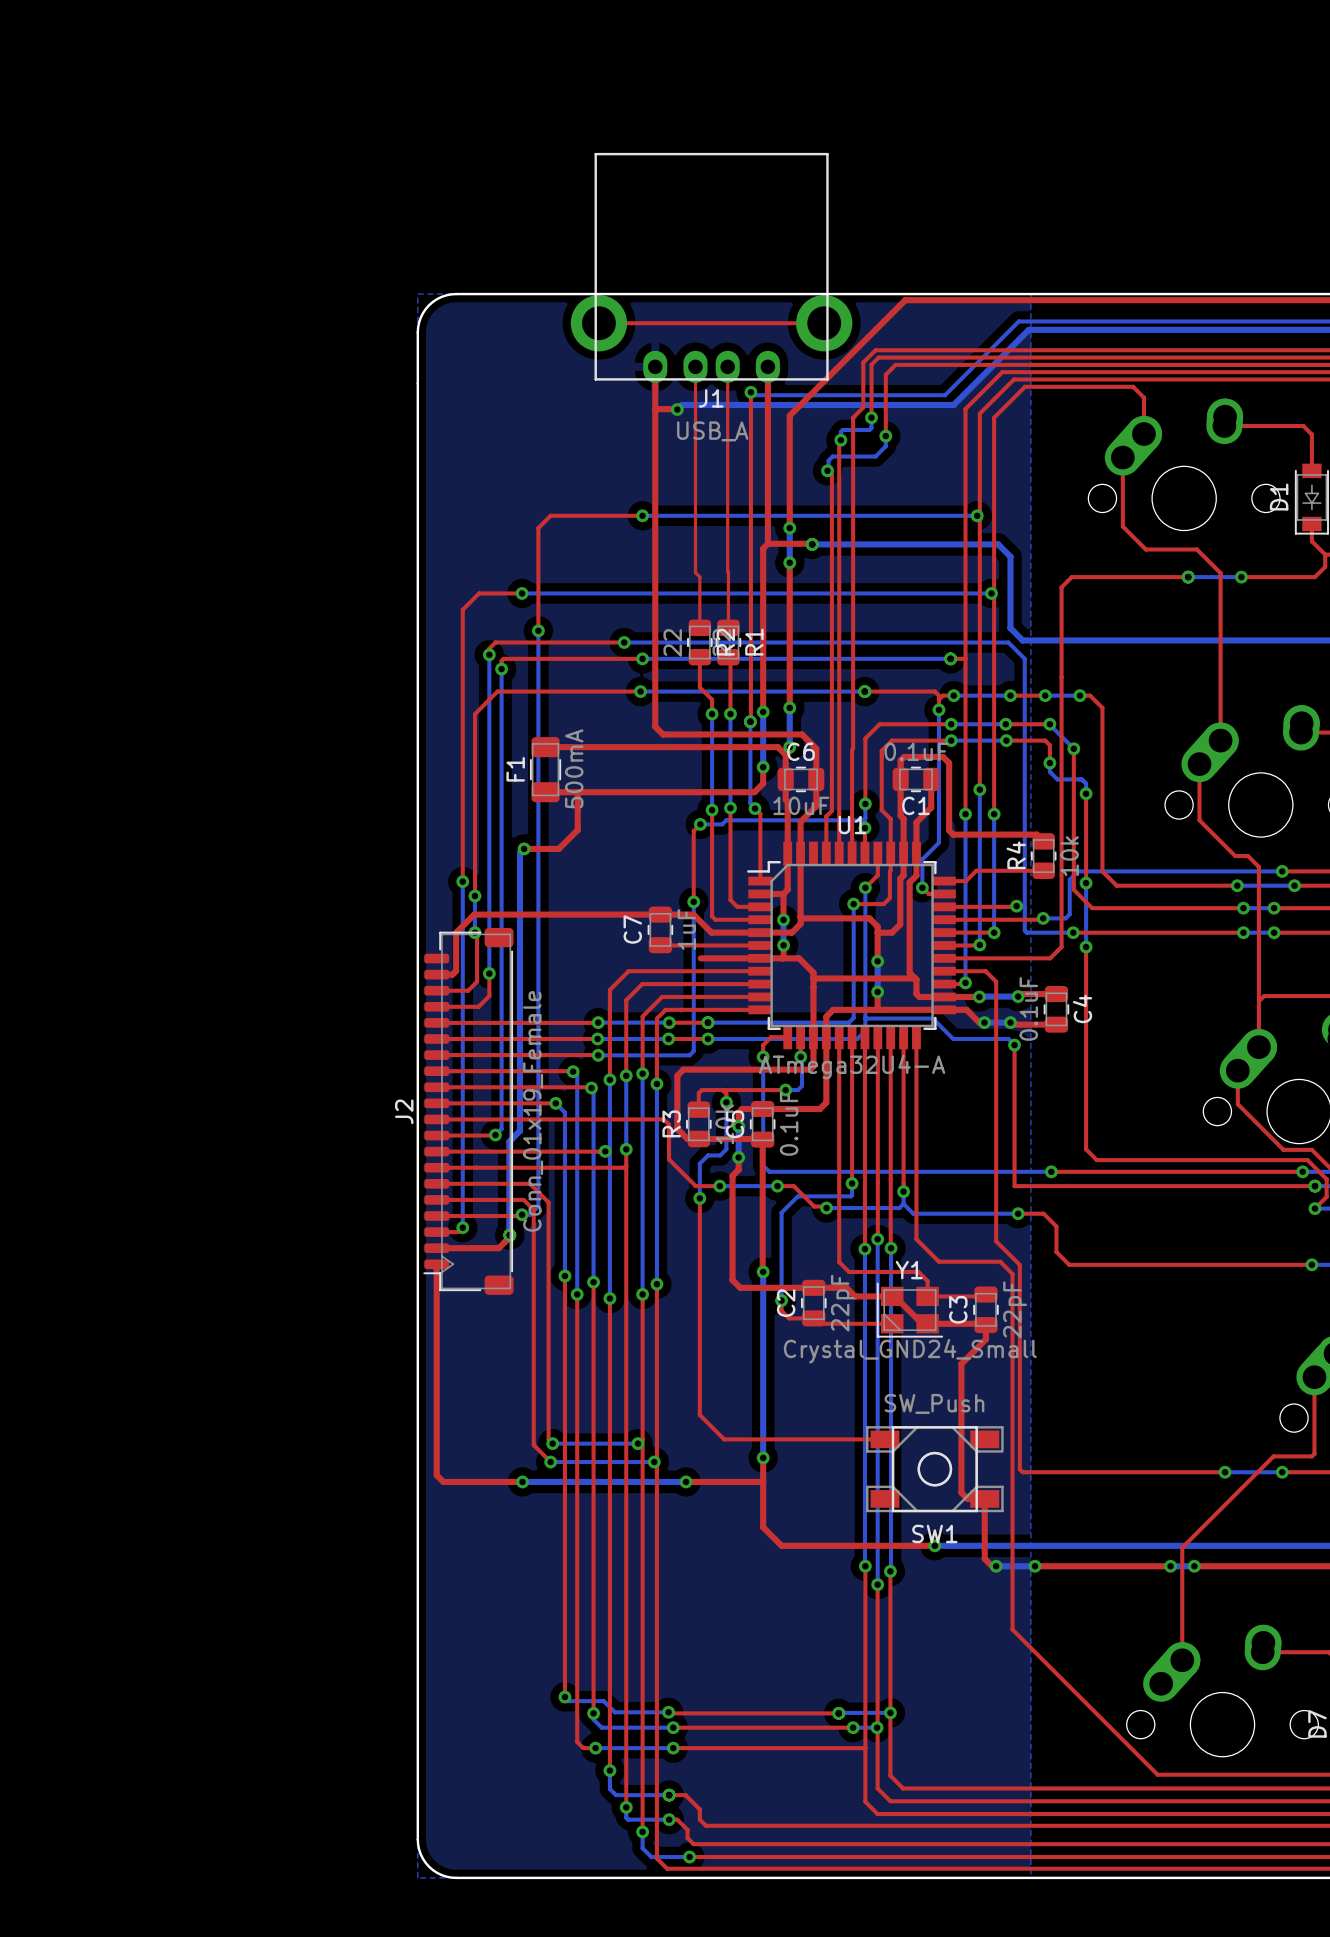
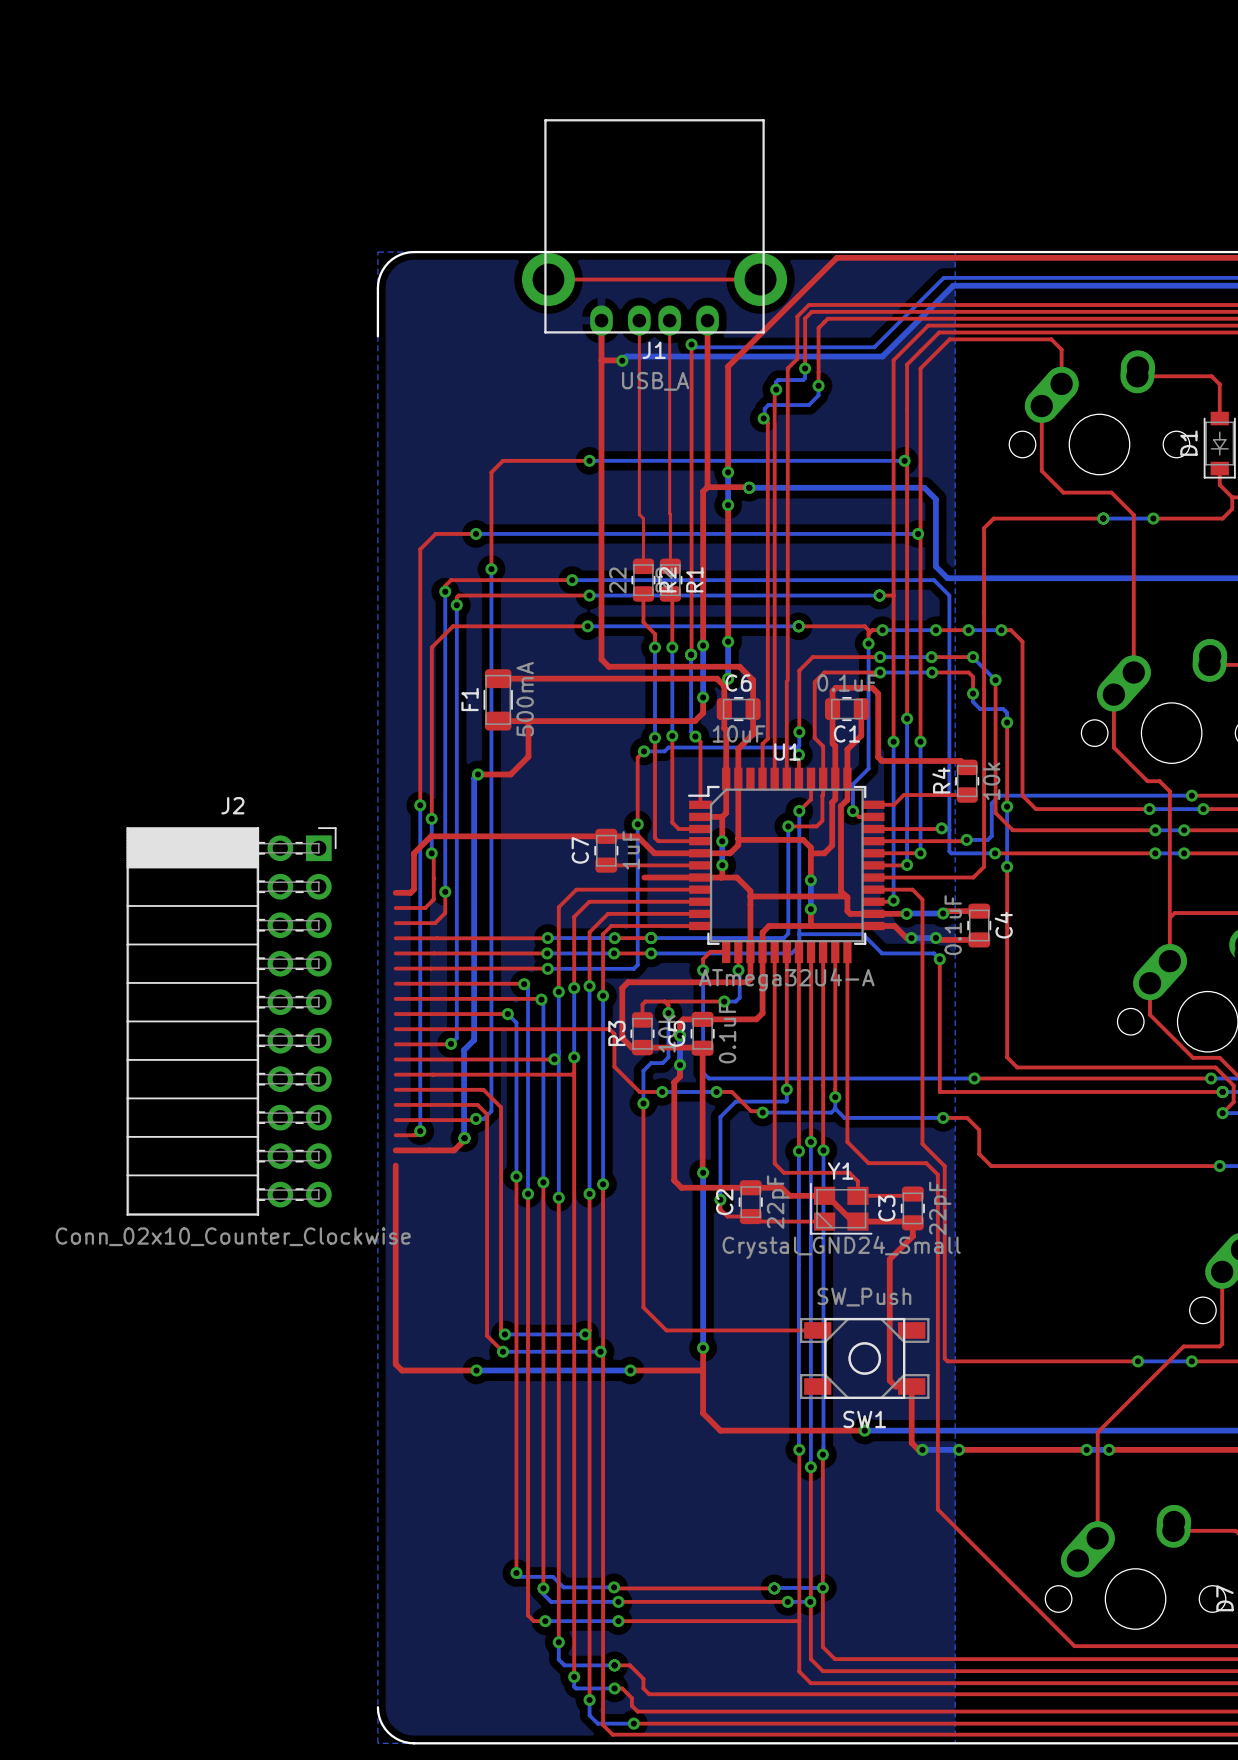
board edge: (417, 383) (417, 1839) -> none
J2 footprint: [423, 927, 514, 1295] -> [126, 827, 337, 1216]
J2 name position: J2 (404, 1111) -> J2 (232, 805)
J2 value: Conn_01x19_Female (533, 1111) -> Conn_02x10_Counter_Clockwise (233, 1236)

